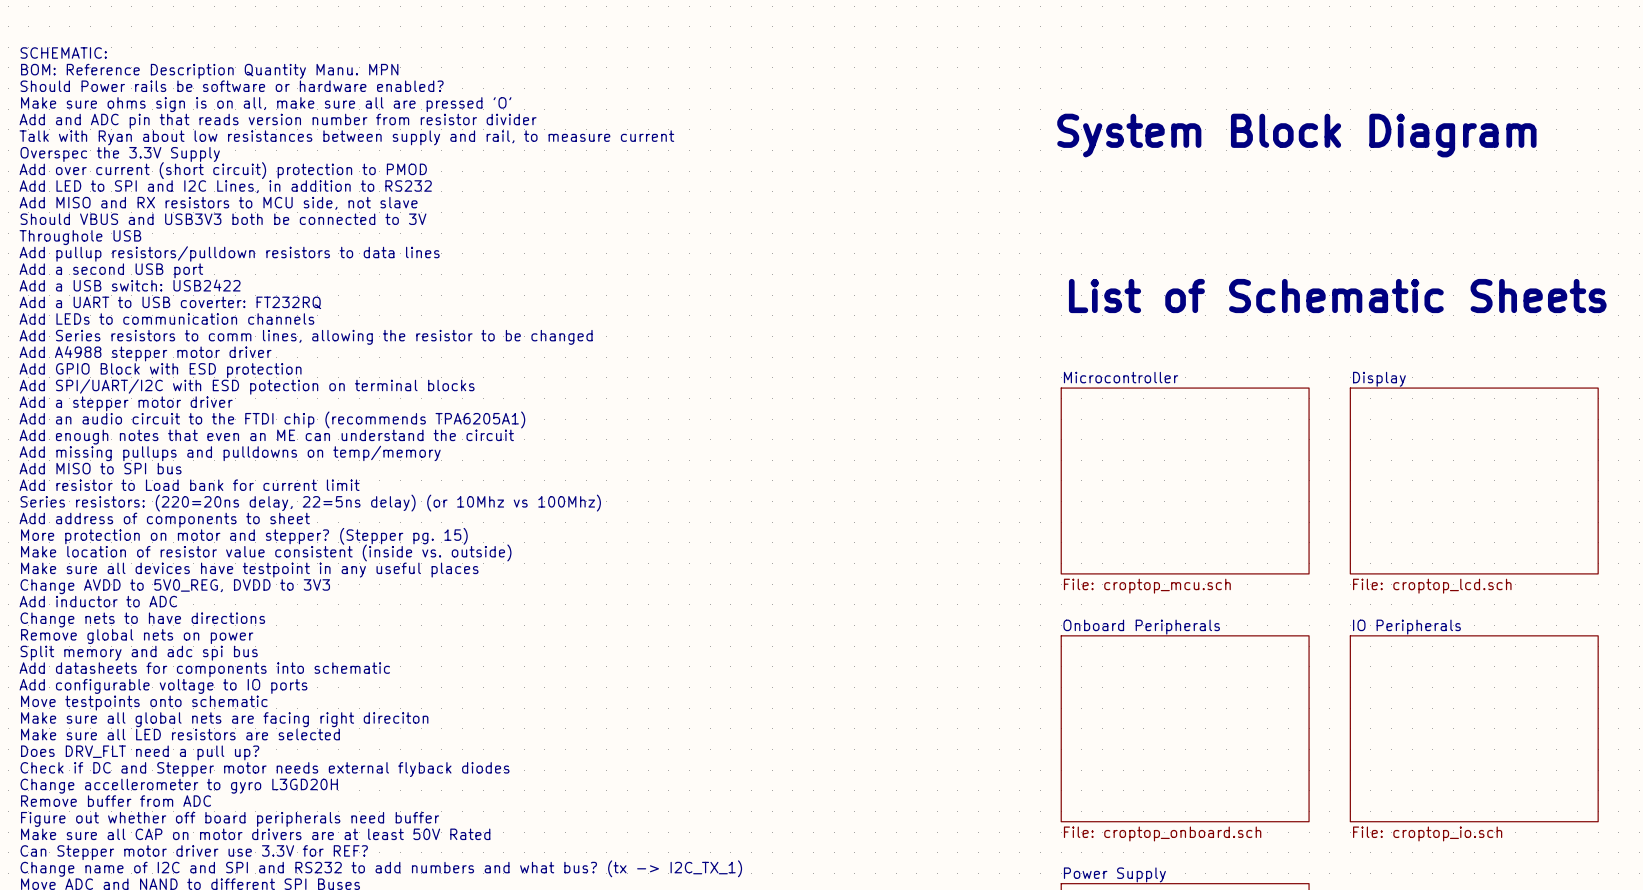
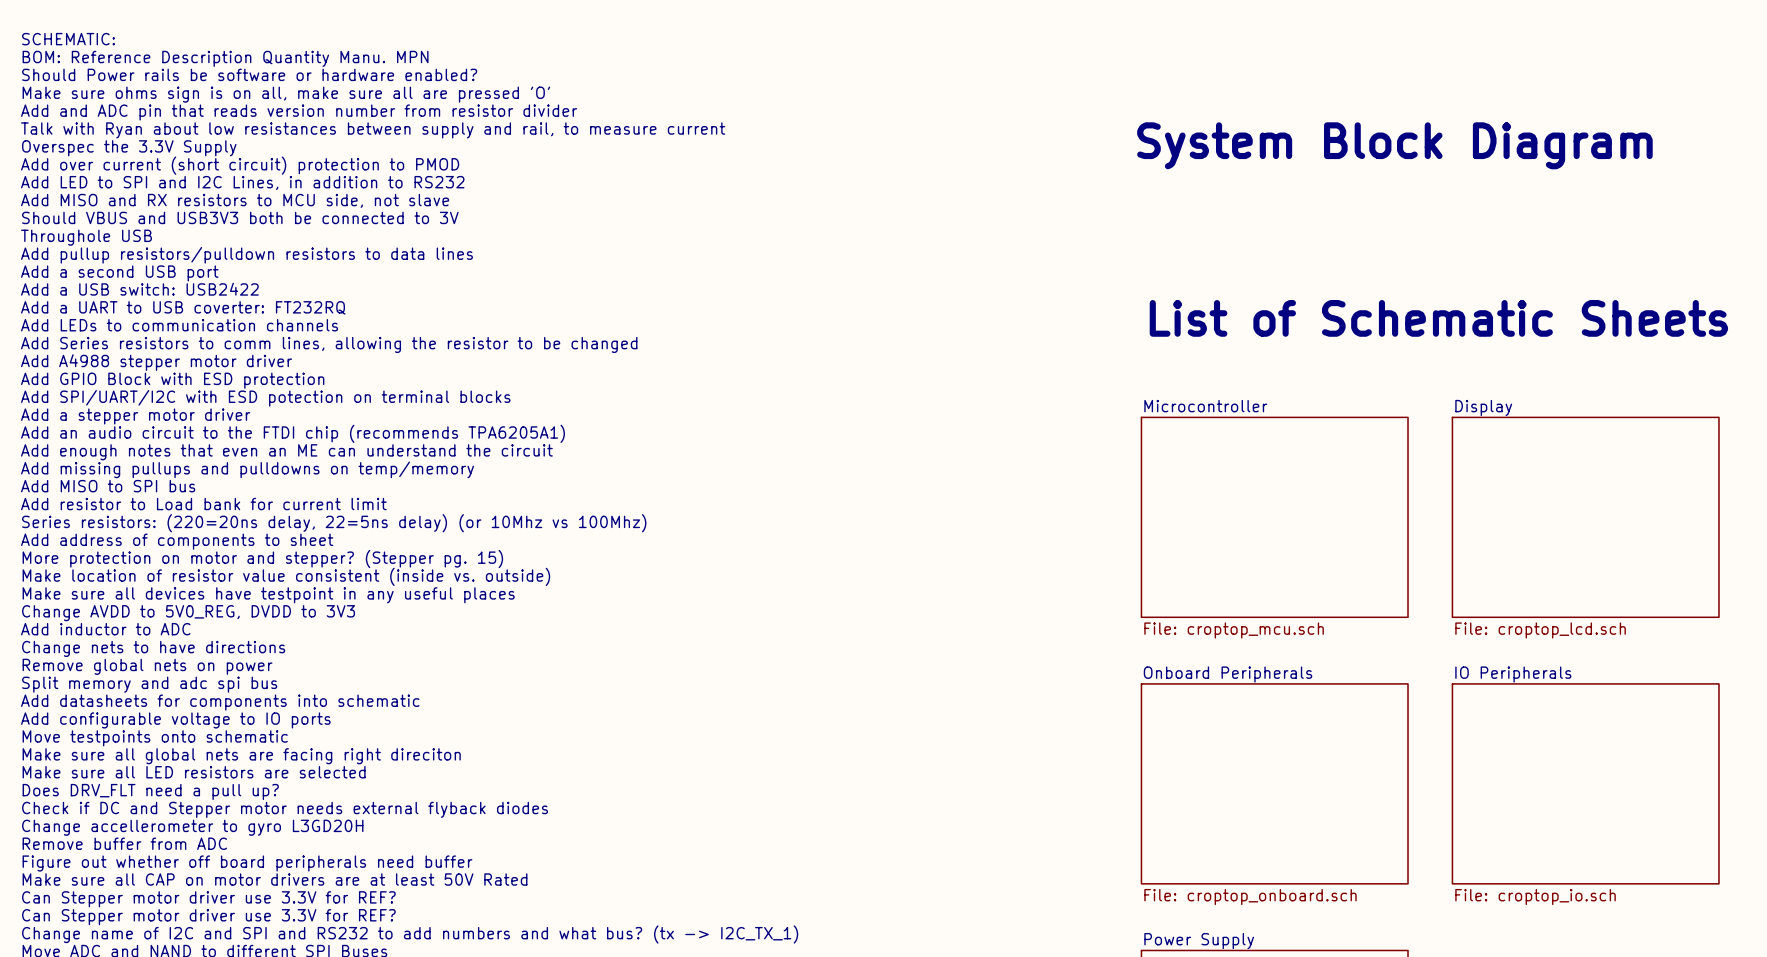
text: none -> SCHEMATIC: (68, 39)
text: SCHEMATIC: (63, 53) -> BOM: Reference Description Quantity Manu. MPN (225, 58)
text: BOM: Reference Description Quantity Manu. MPN (209, 71) -> Should Power rails be software or hardware enabled? (249, 74)
text: Should Power rails be software or hardware enabled? (232, 86) -> Make sure ohms sign is on all, make sure all are pressed 'O' (286, 94)
text: Make sure ohms sign is on all, make sure all are pressed 'O' (266, 104) -> Add and ADC pin that reads version number from resistor divider (299, 112)
text: Add and ADC pin that reads version number from resistor divider (278, 121) -> Talk with Ryan about low resistances between supply and rail, to measure current (373, 130)
text: Talk with Ryan about low resistances between supply and rail, to measure current (346, 137) -> Overspec the 3.3V Supply (129, 148)
text: Overspec the 3.3V Supply (120, 154) -> Add over current (short circuit) protection to PMOD (240, 165)
text: Add over current (short circuit) protection to PMOD (223, 170) -> Add LED to SPI and I2C Lines, in addition to RS232 (242, 182)
text: Add LED to SPI and I2C Lines, in addition to RS232 (225, 186) -> Add MISO and RX resistors to MCU side, not slave (235, 200)
text: Add MISO and RX resistors to MCU side, not slave (218, 203) -> Should VBUS and USB3V3 both be connected to 3V (240, 217)
text: Should VBUS and USB3V3 both be connected to 3V (223, 219) -> Throughole USB (86, 237)
text: Throughole USB (80, 237) -> Add pullup resistors/pulldown resistors to data lines (246, 255)
text: Add pullup resistors/pulldown resistors to data lines (229, 253) -> Add a second USB port (119, 273)
text: Add a second USB port (111, 270) -> Add a USB switch: USB2422 (139, 289)
text: Add a USB switch: USB2422 (130, 285) -> Add a UART to USB coverter: FT232RQ (183, 307)
text: Add a UART to USB coverter: FT232RQ (170, 302) -> Add LEDs to communication channels (179, 325)
text: Add LEDs to communication channels (166, 318) -> Add Series resistors to comm lines, allowing the resistor to be changed (329, 344)
text: Add Series resistors to comm lines, allowing the resistor to be changed (306, 337) -> Add A4988 stepper motor driver (156, 362)
text: Add A4988 stepper motor driver (145, 353) -> Add GPIO Block with ESD protection (172, 380)
text: Add GPIO Block with ESD protection (160, 370) -> Add SPI/UART/I2C with ESD potection on terminal blocks (265, 398)
text: Add SPI/UART/I2C with ESD potection on terminal blocks (247, 386) -> Add a stepper motor driver (135, 416)
text: Add a stepper motor driver (126, 403) -> Add an audio circuit to the FTDI chip (recommends TPA6205A1) (292, 433)
text: Add an audio circuit to the FTDI chip (recommends TPA6205A1) (272, 419) -> Add enough notes that even an ME can understand the circuit (286, 452)
text: Add enough notes that even an ME can understand the circuit (266, 437) -> Add missing pullups and pulldowns on temp/memory (247, 469)
text: Add missing pullups and pulldowns on temp/memory (230, 453) -> Add MISO to SPI bus (108, 486)
text: Add MISO to SPI bus (100, 468) -> Add resistor to Load bank for current limit (203, 504)
text: Add resistor to Load bank for current limit (189, 485) -> Series resistors: (220=20ns delay, 22=5ns delay) (or 10Mhz vs 100Mhz) (334, 523)
text: Series resistors: (220=20ns delay, 22=5ns delay) (or 10Mhz vs 100Mhz) (310, 503) -> Add address of components to sheet (177, 541)
text: Add address of components to sheet (164, 520) -> More protection on motor and stepper? (Stepper pg. 15) (262, 558)
text: More protection on motor and stepper? (Stepper pg. 15) (244, 536) -> Make location of resistor value consistent (inside vs. outside) (286, 576)
text: Make location of resistor value consistent (inside vs. outside) (266, 552) -> Make sure all devices have testpoint in any useful places (268, 595)
text: Make sure all devices have testpoint in any useful places (249, 570) -> Change AVDD to 5V0_REG, DVDD to 3V3 (188, 613)
text: Change AVDD to 5V0_REG, DVDD to 3V3 (175, 586) -> Add inductor to ADC (105, 629)
text: Add inductor to ADC (98, 601) -> Change nets to have directions (153, 648)
text: Change nets to have directions (142, 619) -> Remove global nets on power (147, 666)
text: Remove global nets on power (137, 636) -> Split memory and adc spi bus (149, 684)
text: Split memory and adc spi bus (139, 653) -> Add datasheets for components into schematic (220, 702)
text: Add datasheets for components into schematic (204, 669) -> Add configurable voltage to IO ports (175, 720)
text: Add configurable voltage to IO ports (163, 686) -> Move testpoints onto schematic (155, 738)
text: Move testpoints onto schematic (144, 703) -> Make sure all global nets are facing right direciton (241, 756)
text: Make sure all global nets are facing right direciton (224, 719) -> Make sure all LED resistors are selected (194, 772)
text: Make sure all LED resistors are selected (180, 734) -> Does DRV_FLT need a pull up? (150, 791)
text: Does DRV_FLT need a pull up? (140, 752) -> Check if DC and Stepper motor needs external flyback diodes (285, 809)
text: Check if DC and Stepper motor needs external flyback diodes (265, 769) -> Change accellerometer to gyro L3GD20H (192, 827)
text: Change accellerometer to gyro L3GD20H (179, 786) -> Remove buffer from ADC (124, 843)
text: Remove buffer from ADC (116, 801) -> Figure out whether off board peripherals need buffer (247, 863)
text: Figure out whether off board peripherals need buffer (230, 819) -> Make sure all CAP on motor drivers are at least 50V Rated (275, 879)
text: Make sure all CAP on motor drivers are at least 50V Rated (255, 834) -> Can Stepper motor driver use 3.3V for REF? (208, 899)

